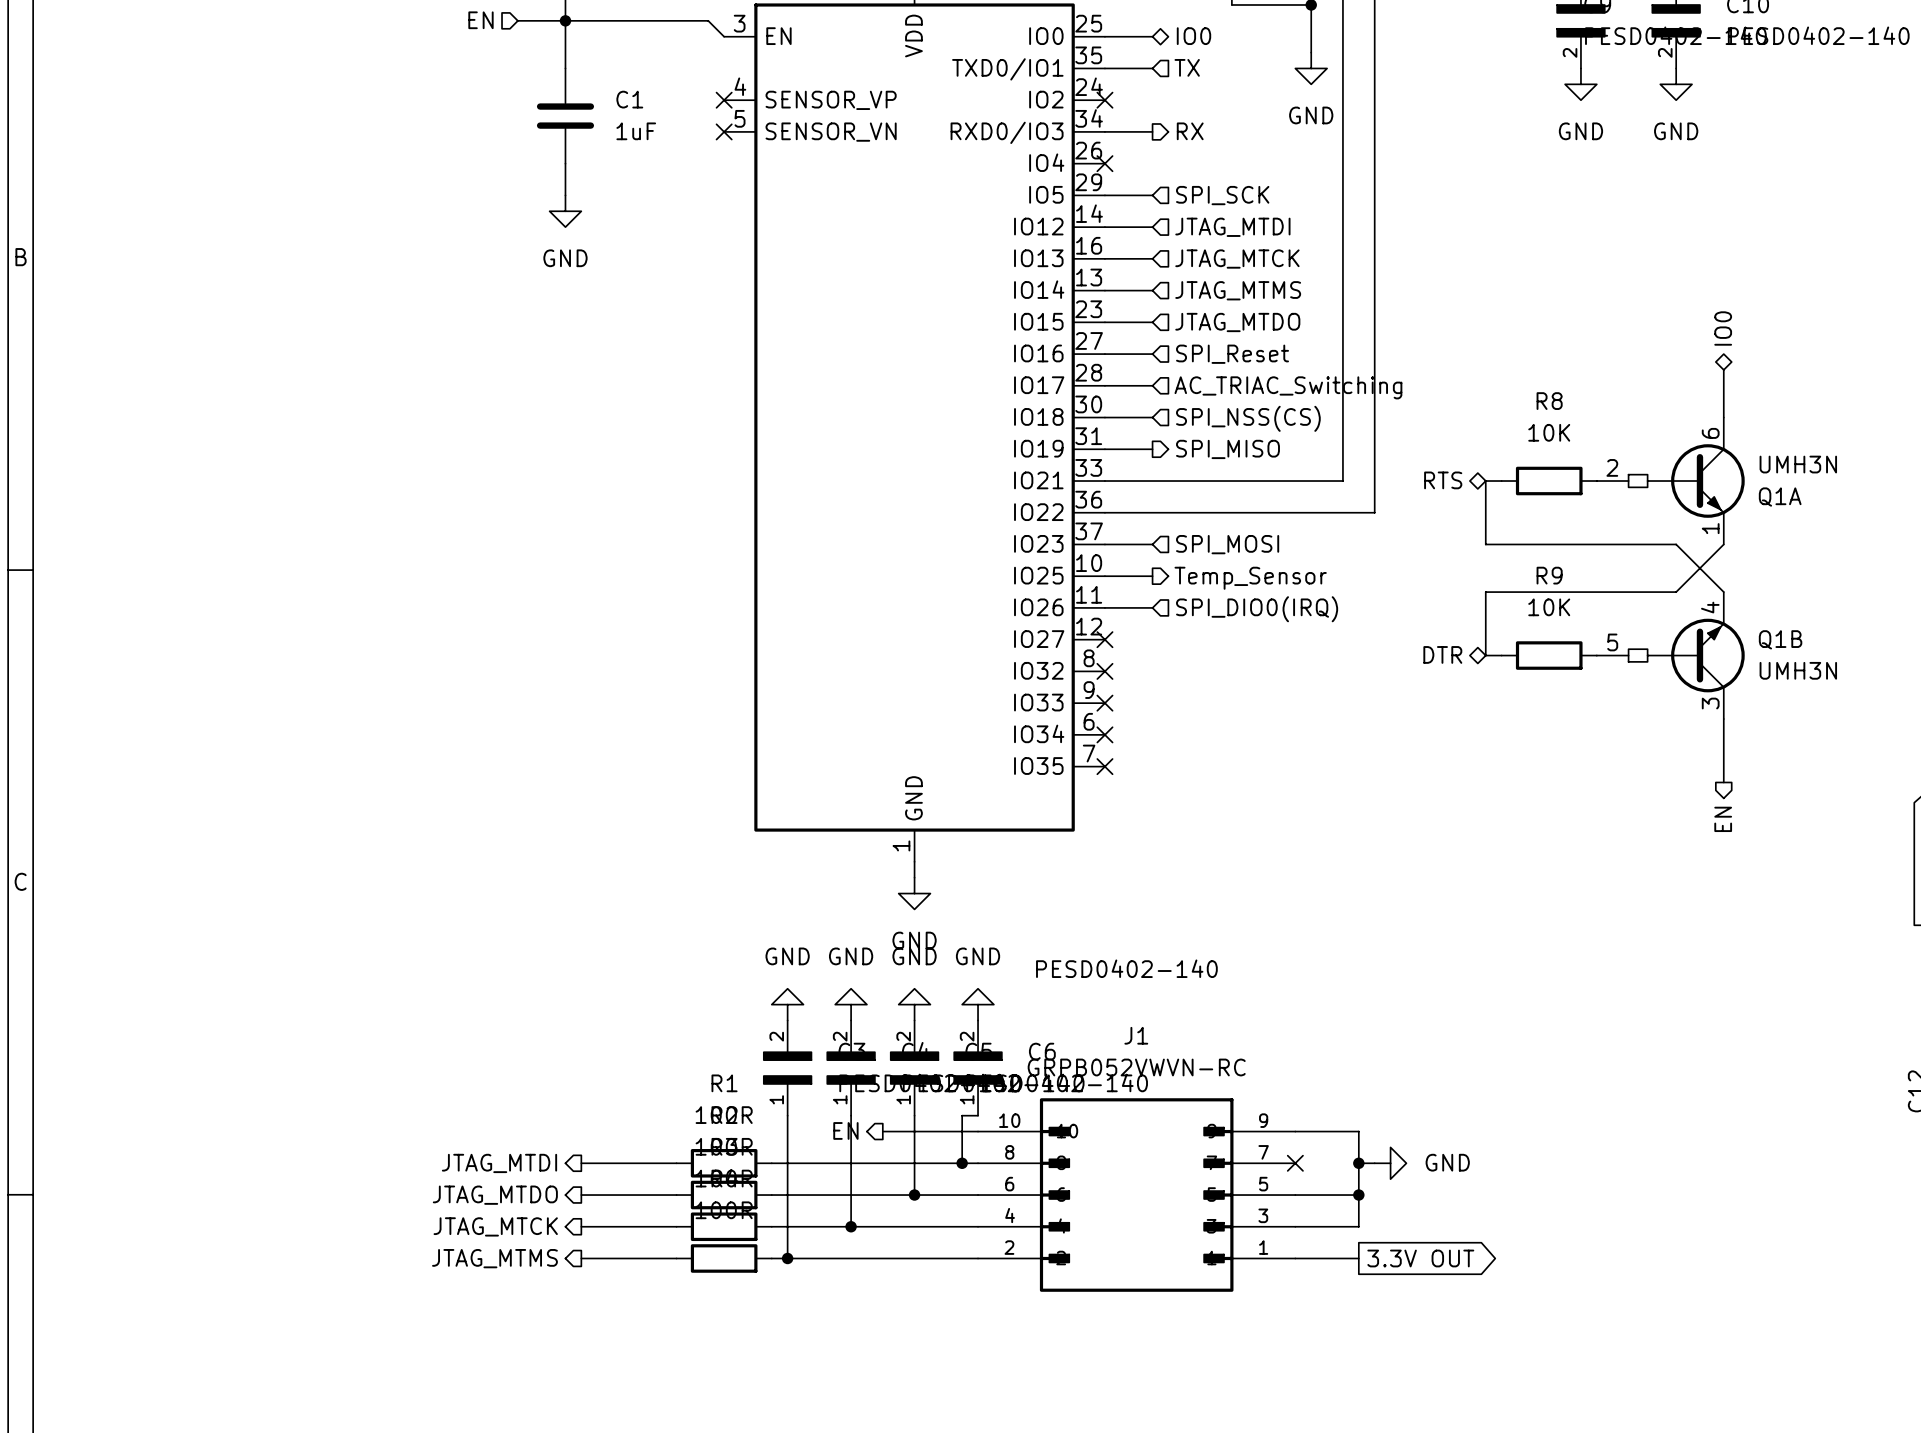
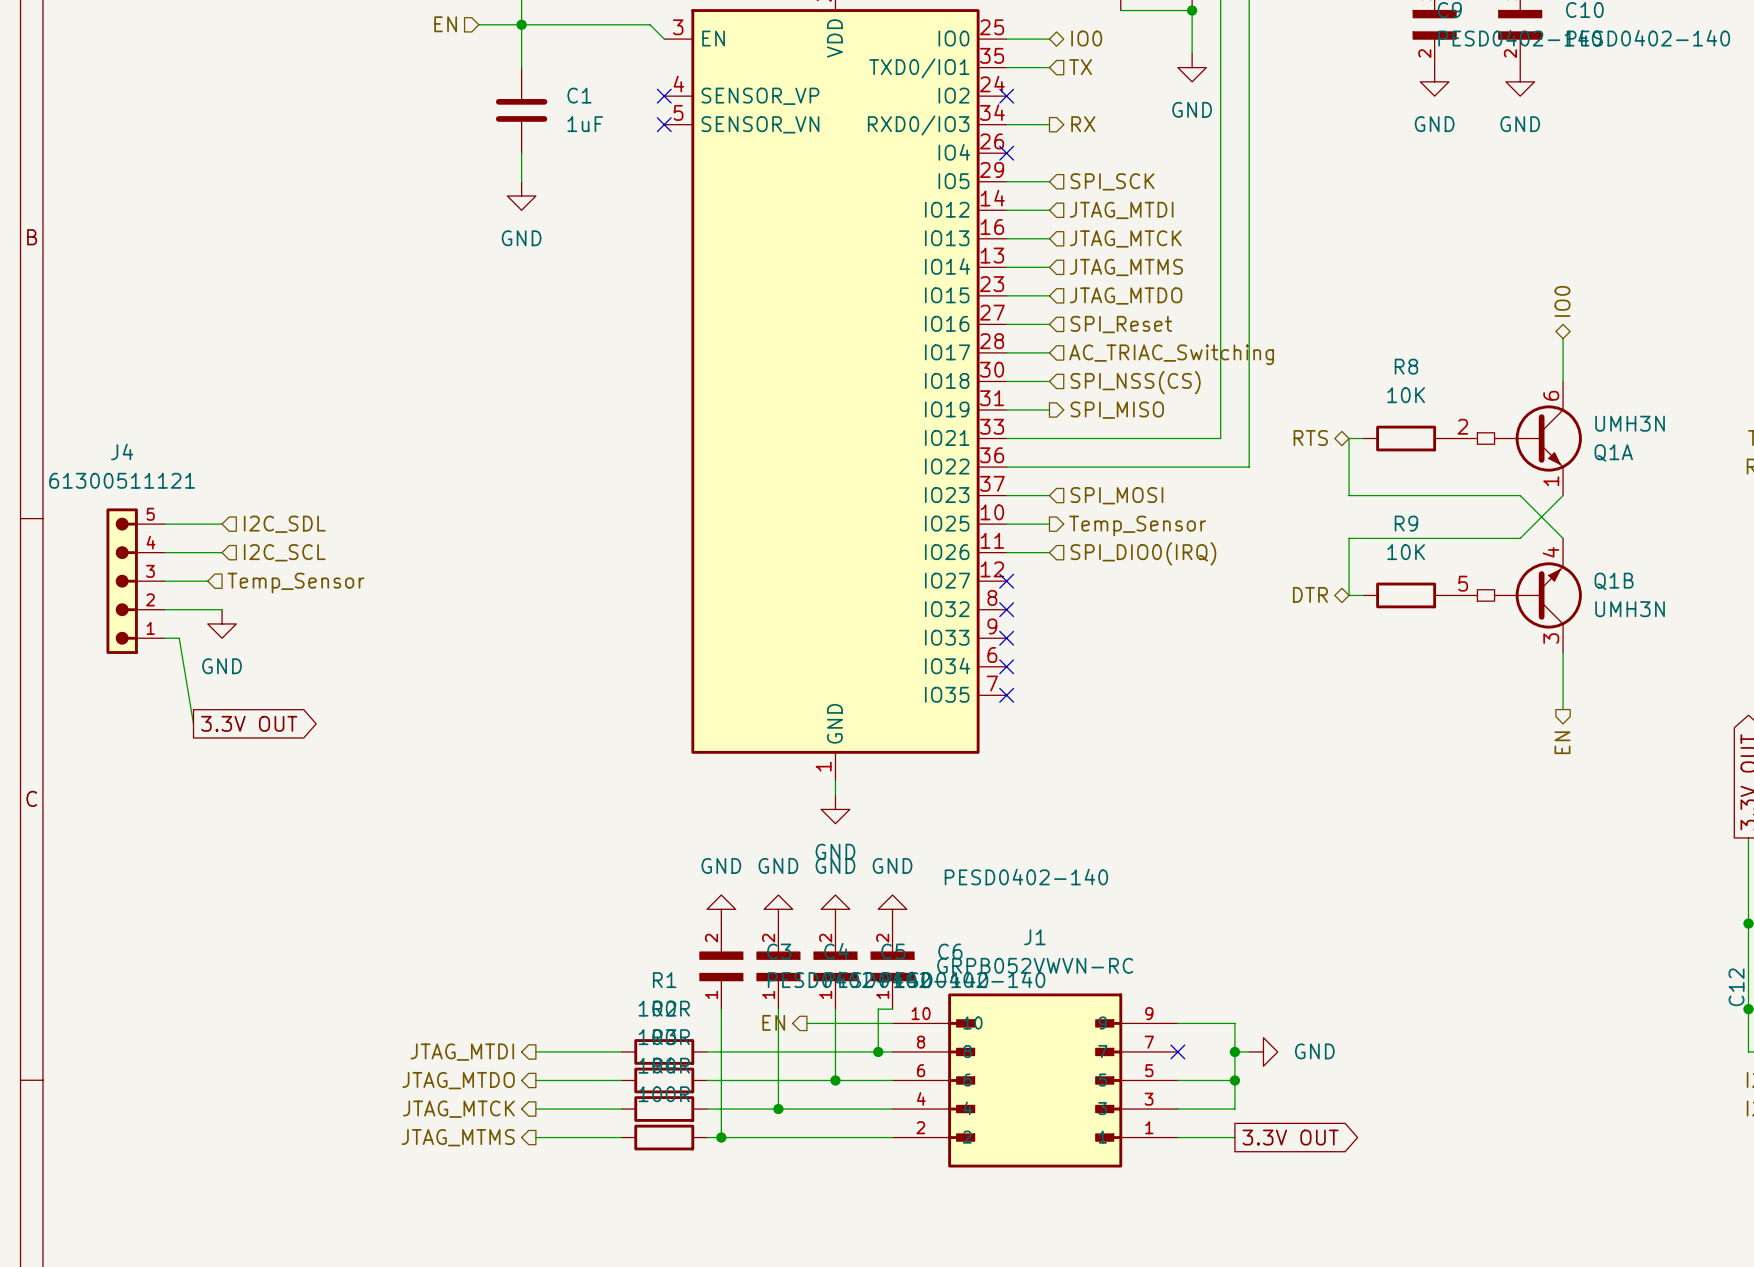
wire: none -> (164, 524) (222, 524)
hierarchical label: none -> I2C_SDL (284, 524)
wire: none -> (164, 552) (222, 552)
hierarchical label: none -> I2C_SCL (284, 552)
J4: none -> 61300511121 (135, 581)
wire: none -> (164, 581) (207, 581)
hierarchical label: none -> Temp_Sensor (295, 583)
wire: none -> (164, 609) (222, 609)
power symbol: none -> GND (222, 623)
wire: none -> (164, 638) (179, 638) (193, 723)
global label: none -> 3.3V OUT (249, 723)

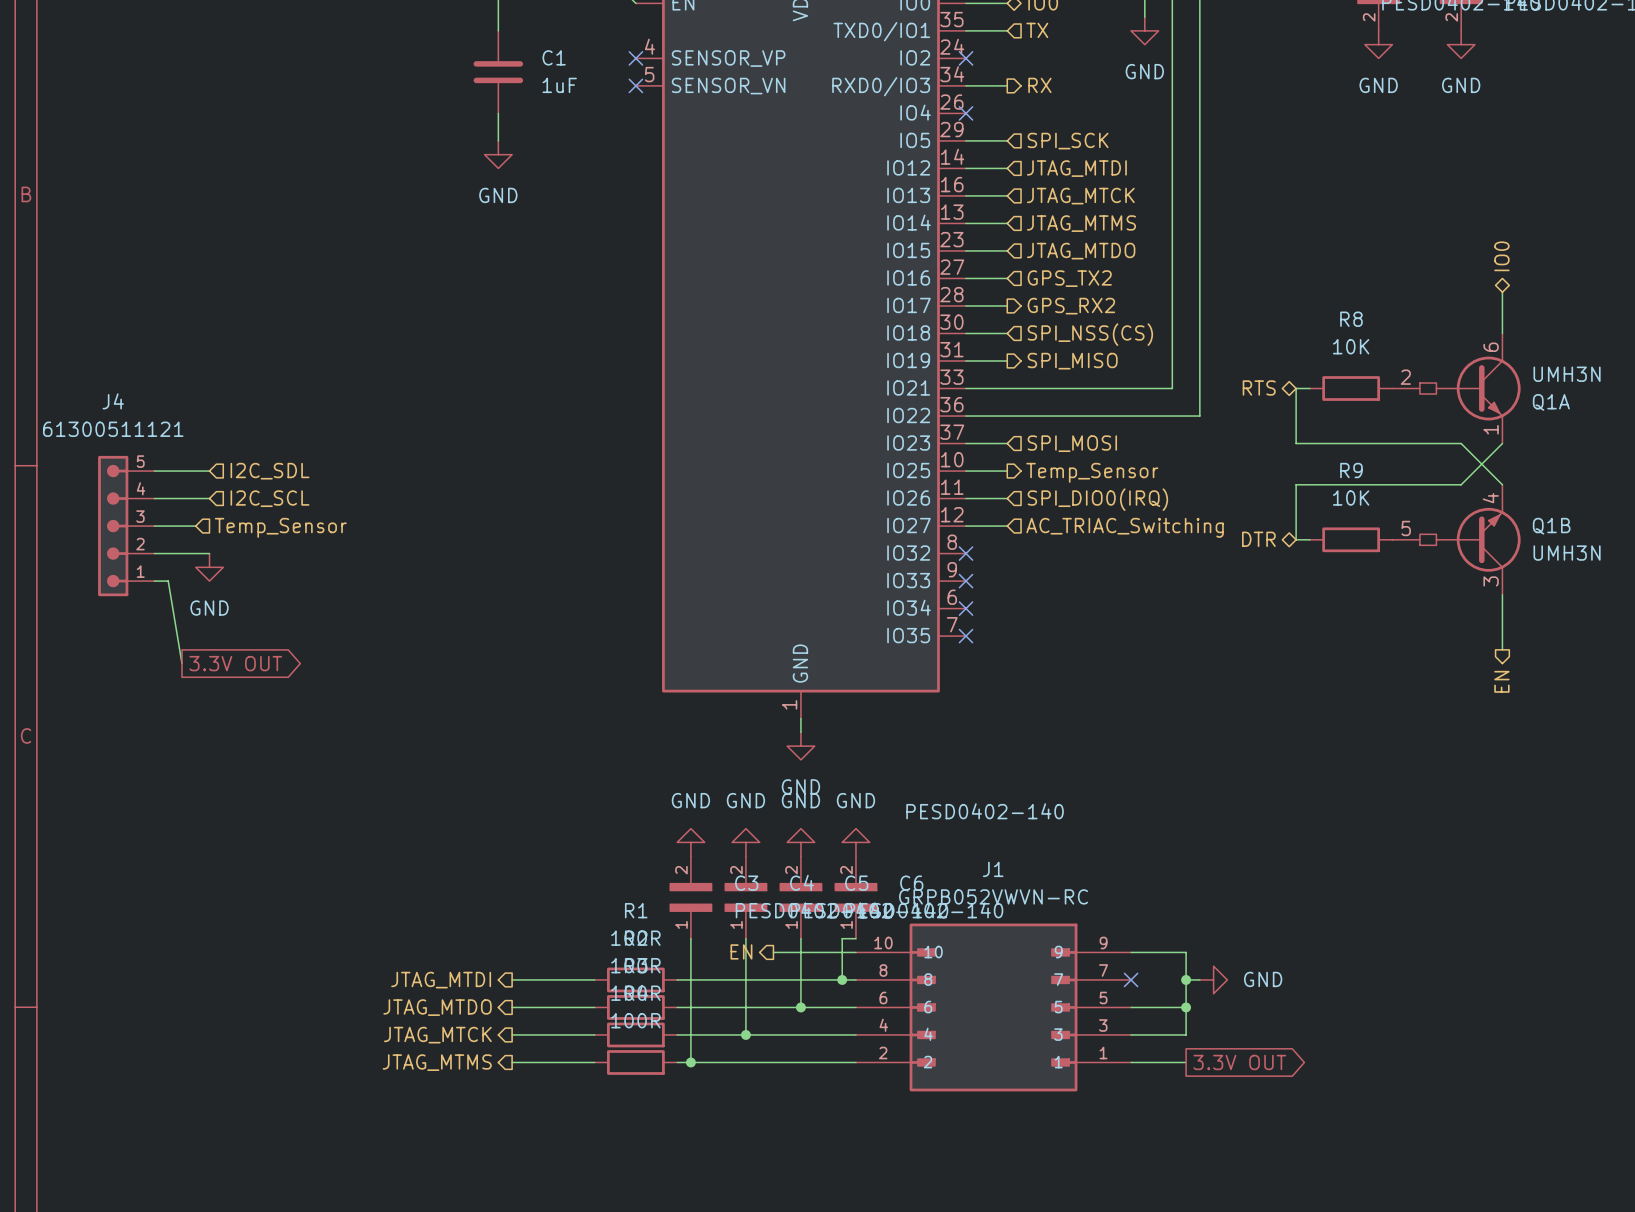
hierarchical label: SPI_Reset (1121, 324) -> GPS_TX2 (1069, 278)
hierarchical label shape: input (1171, 354) -> output (1071, 306)
hierarchical label: AC_TRIAC_Switching (1171, 354) -> GPS_RX2 (1071, 306)
wire: none -> (966, 526) (1007, 526)
no-connect mark: (1006, 581) -> none
hierarchical label: none -> AC_TRIAC_Switching (1125, 527)

